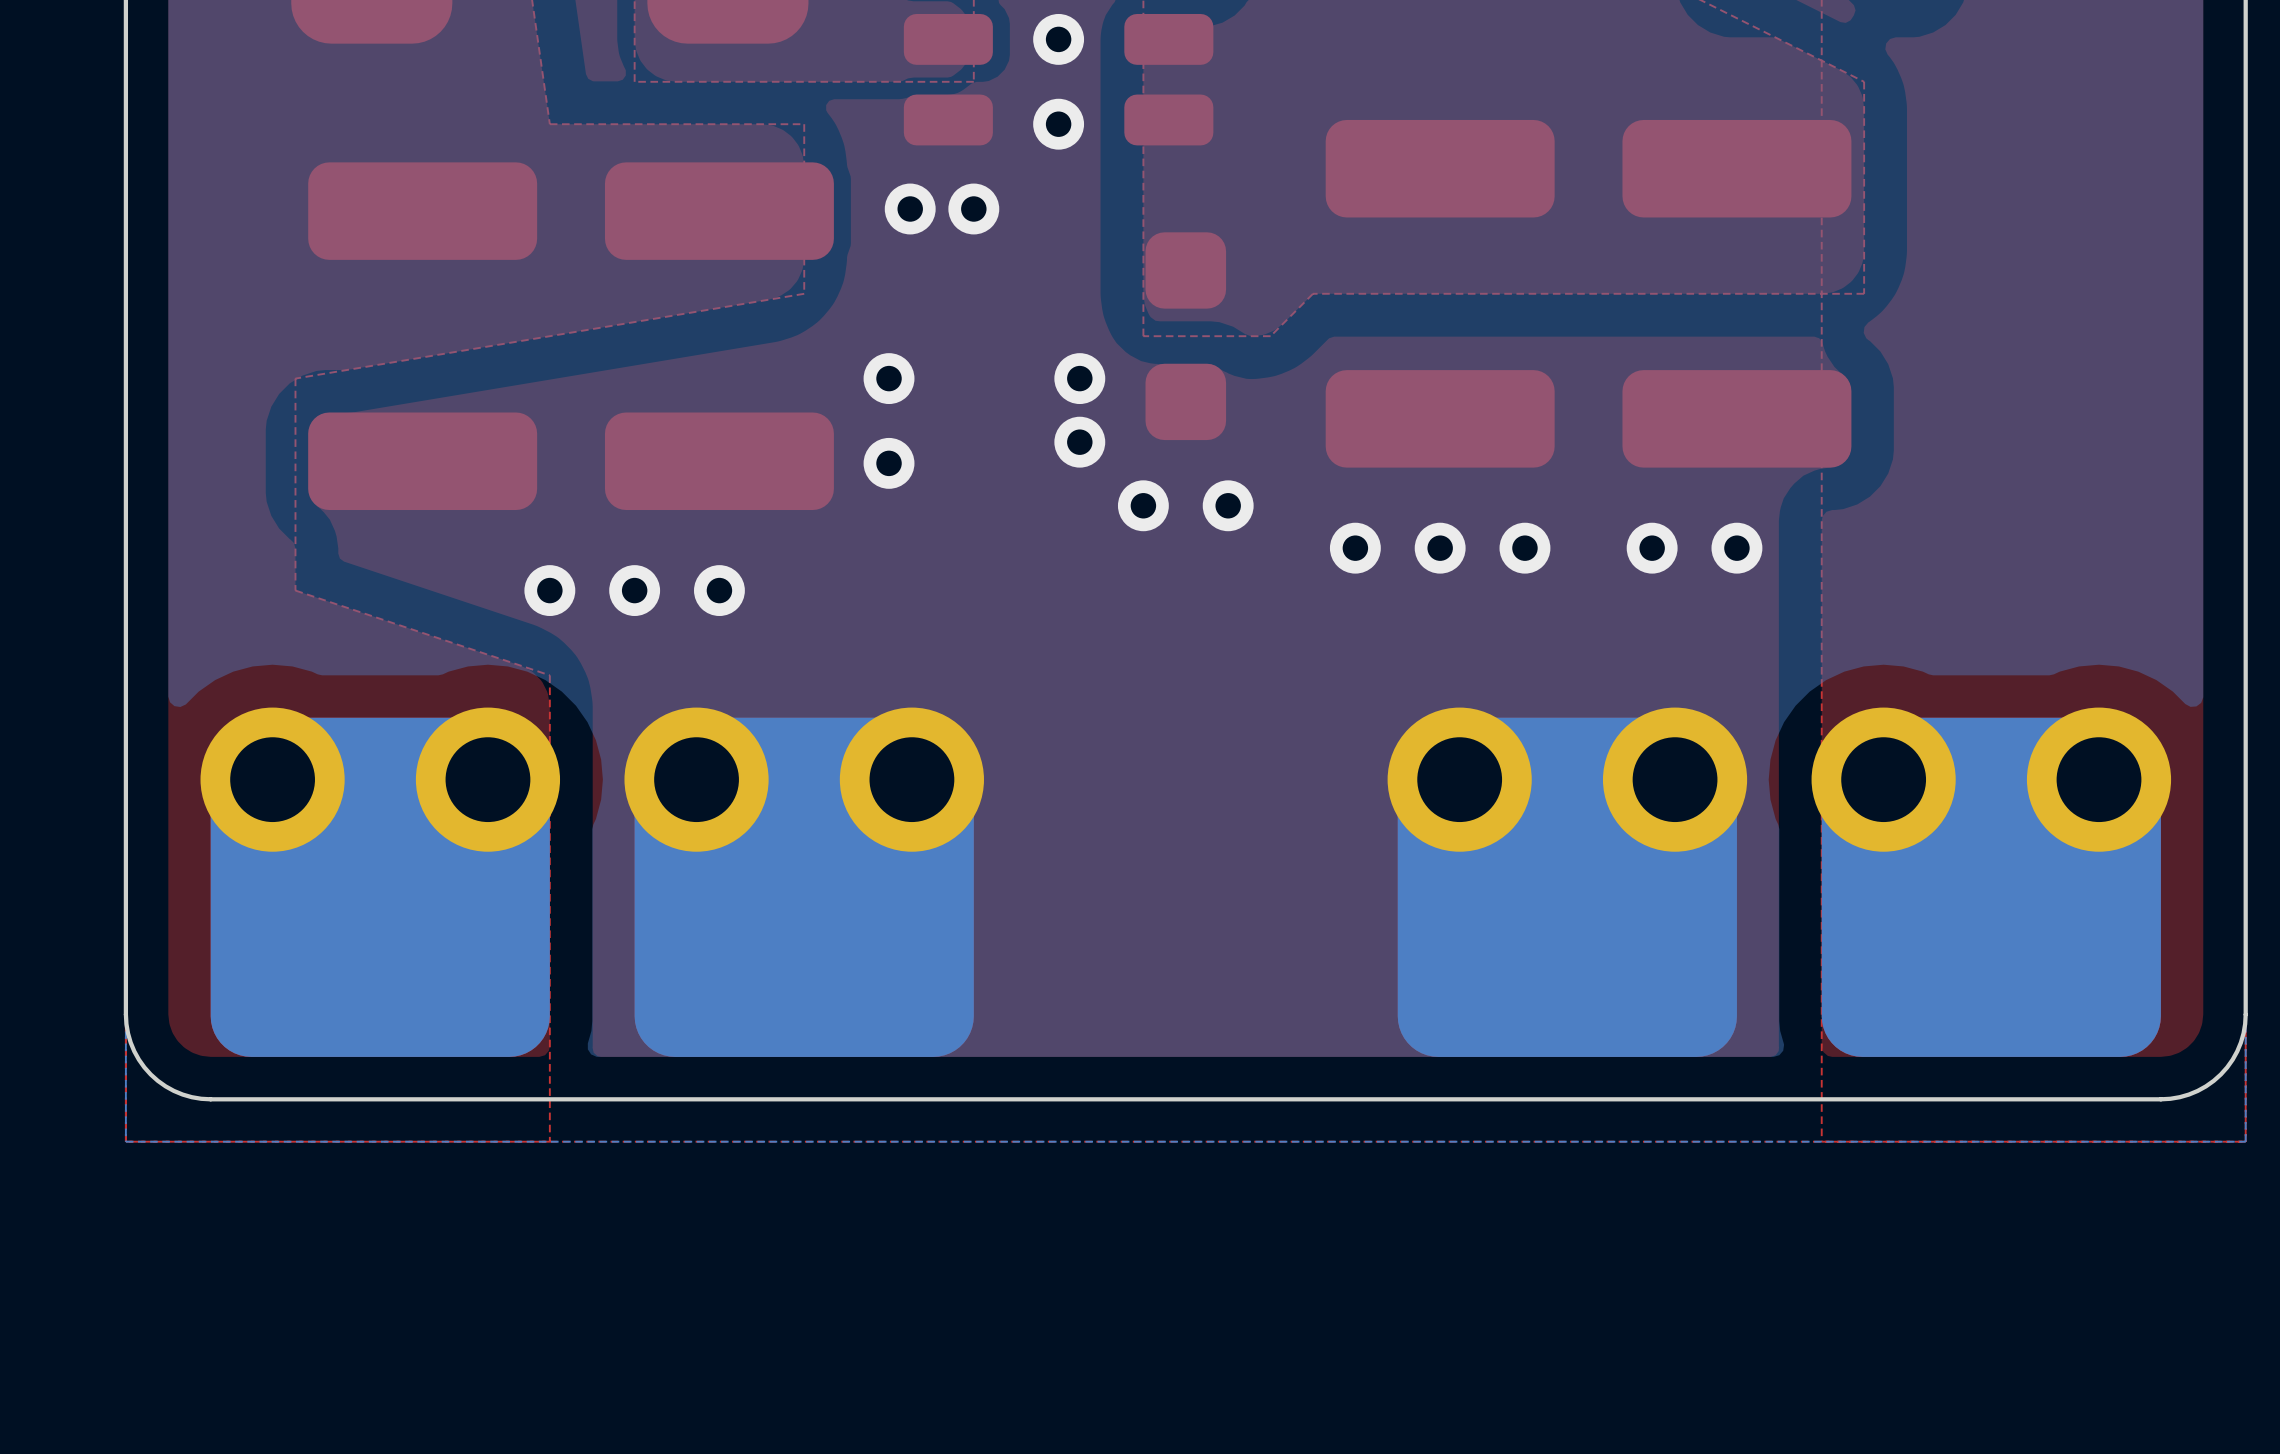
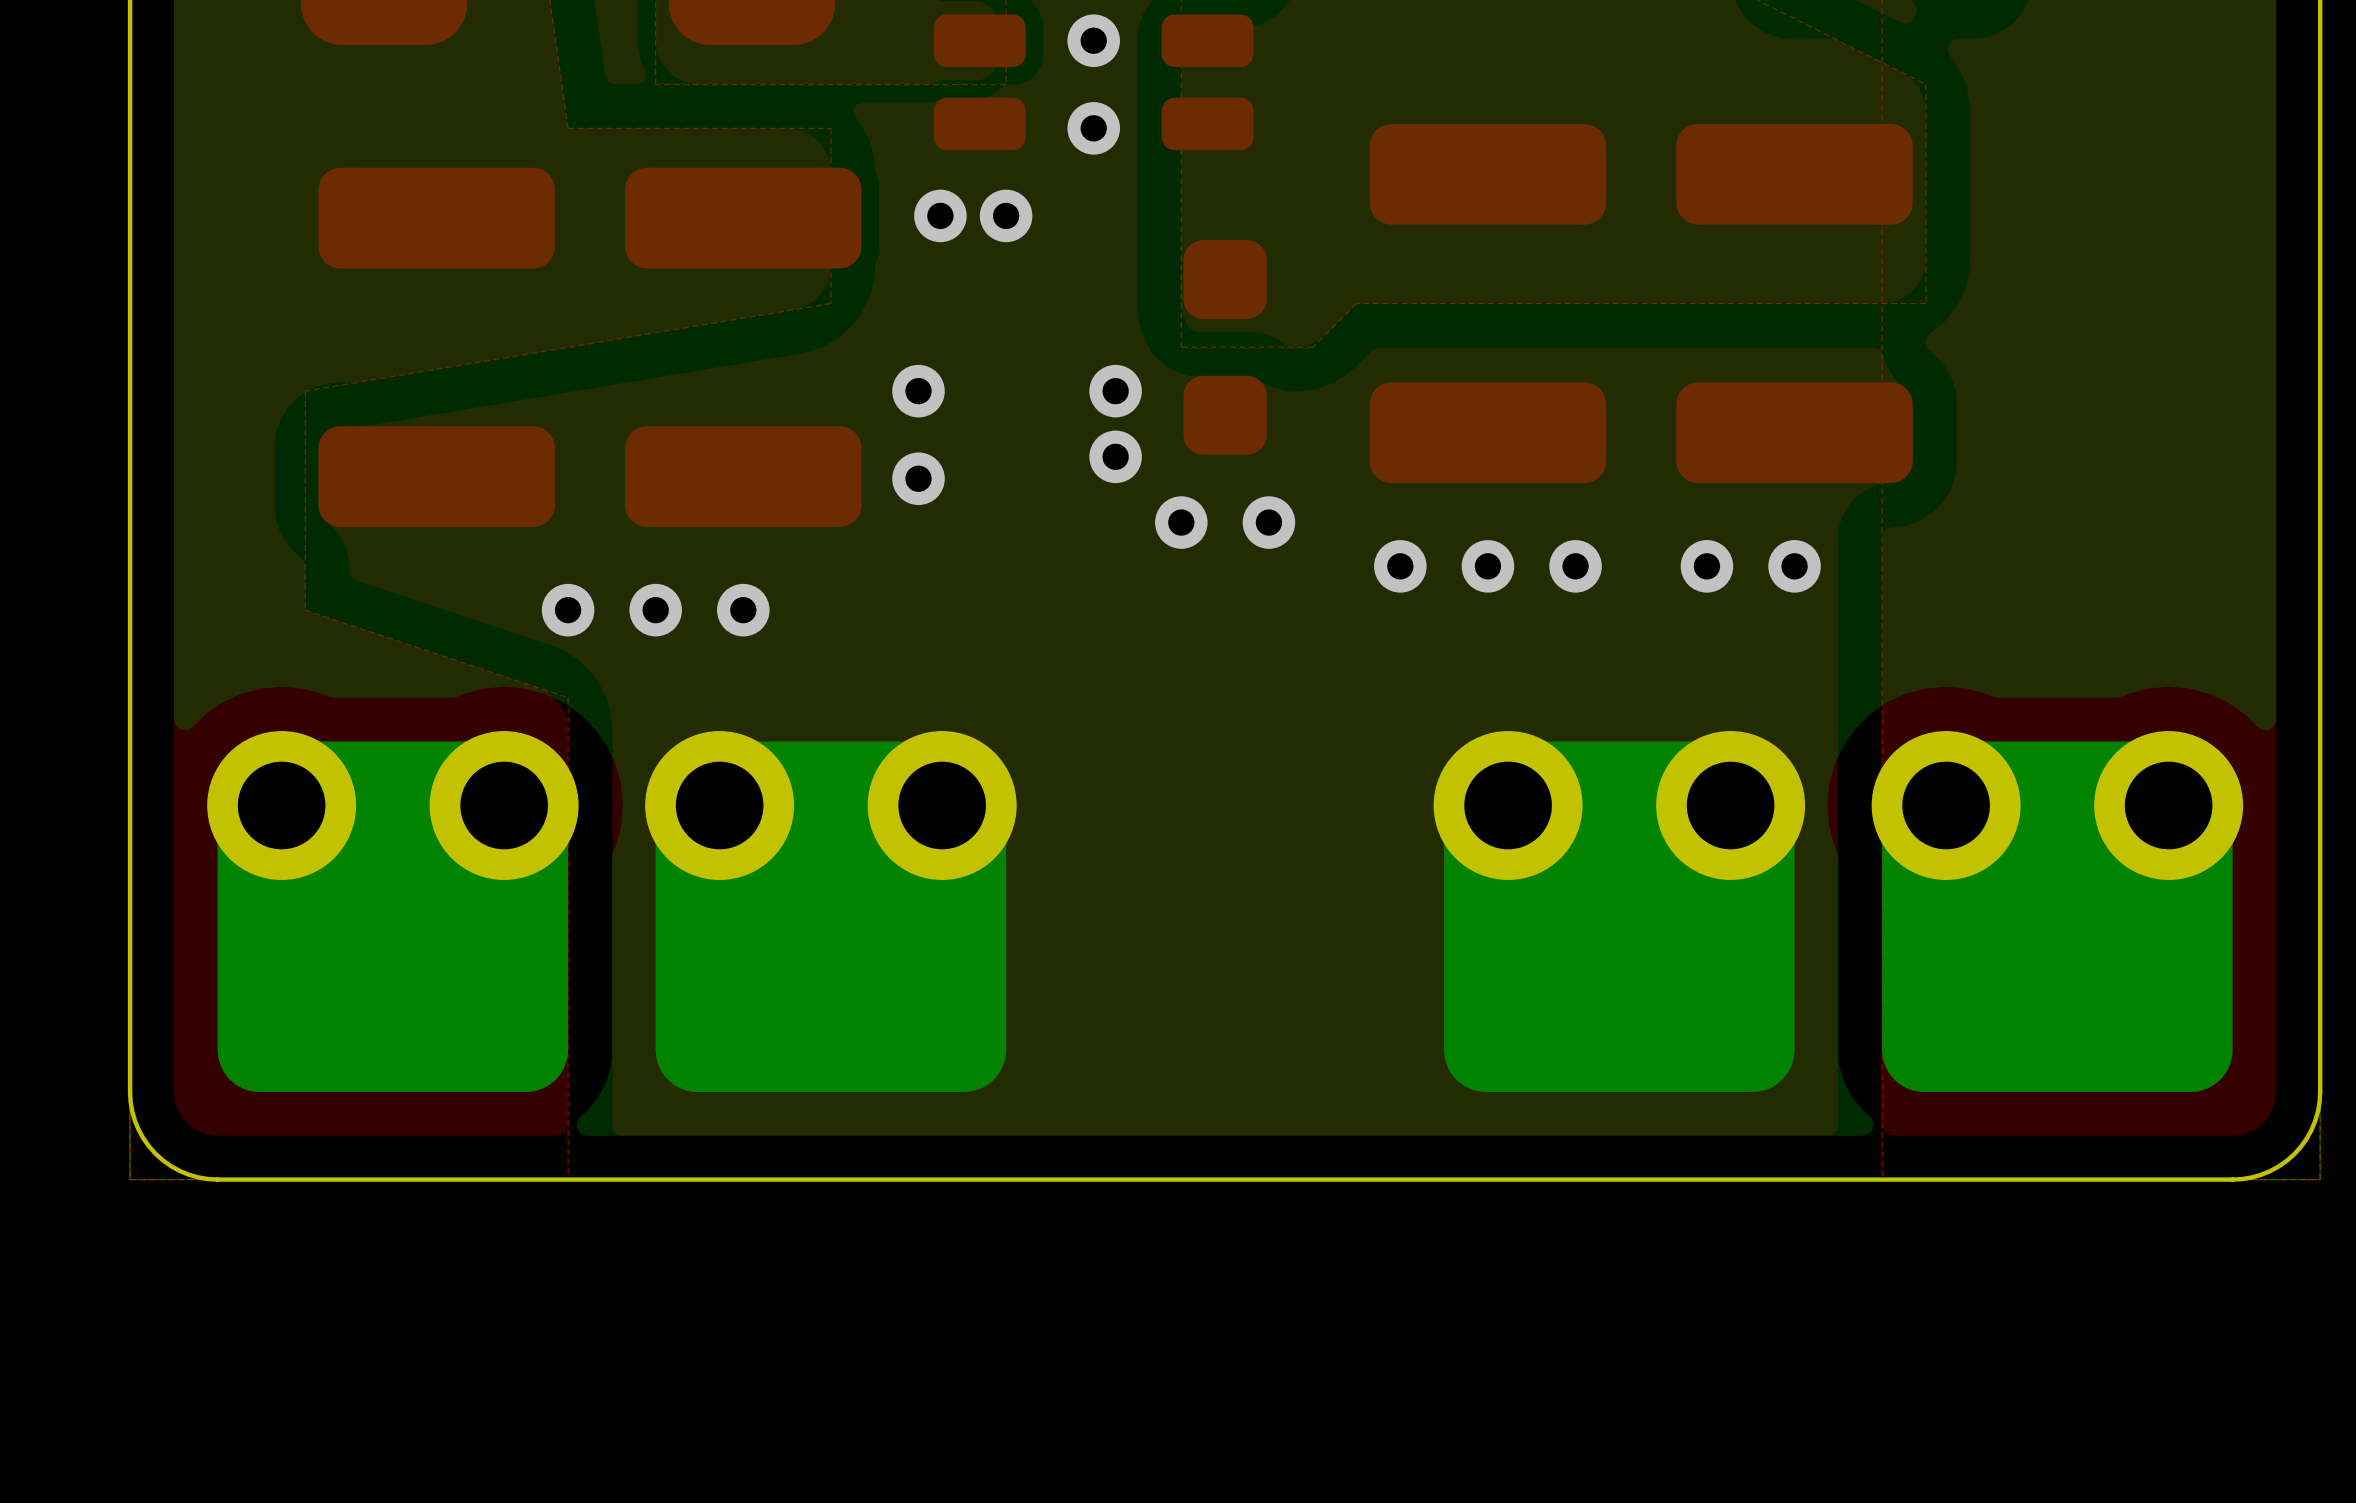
board edge: (2245, 1014) (2243, 1033) (2237, 1051) (2220, 1074) (2206, 1086) (2188, 1094) (2160, 1099) (210, 1099) (191, 1097) (173, 1090) (150, 1074) (138, 1059) (130, 1042) (125, 1014) -> (2320, 1048) (2319, 1101) (2315, 1120) (2306, 1138) (2294, 1153) (2279, 1166) (2252, 1177) (2232, 1179) (207, 1179) (188, 1174) (171, 1166) (155, 1153) (143, 1138) (134, 1120) (130, 1101) (130, 1048)

